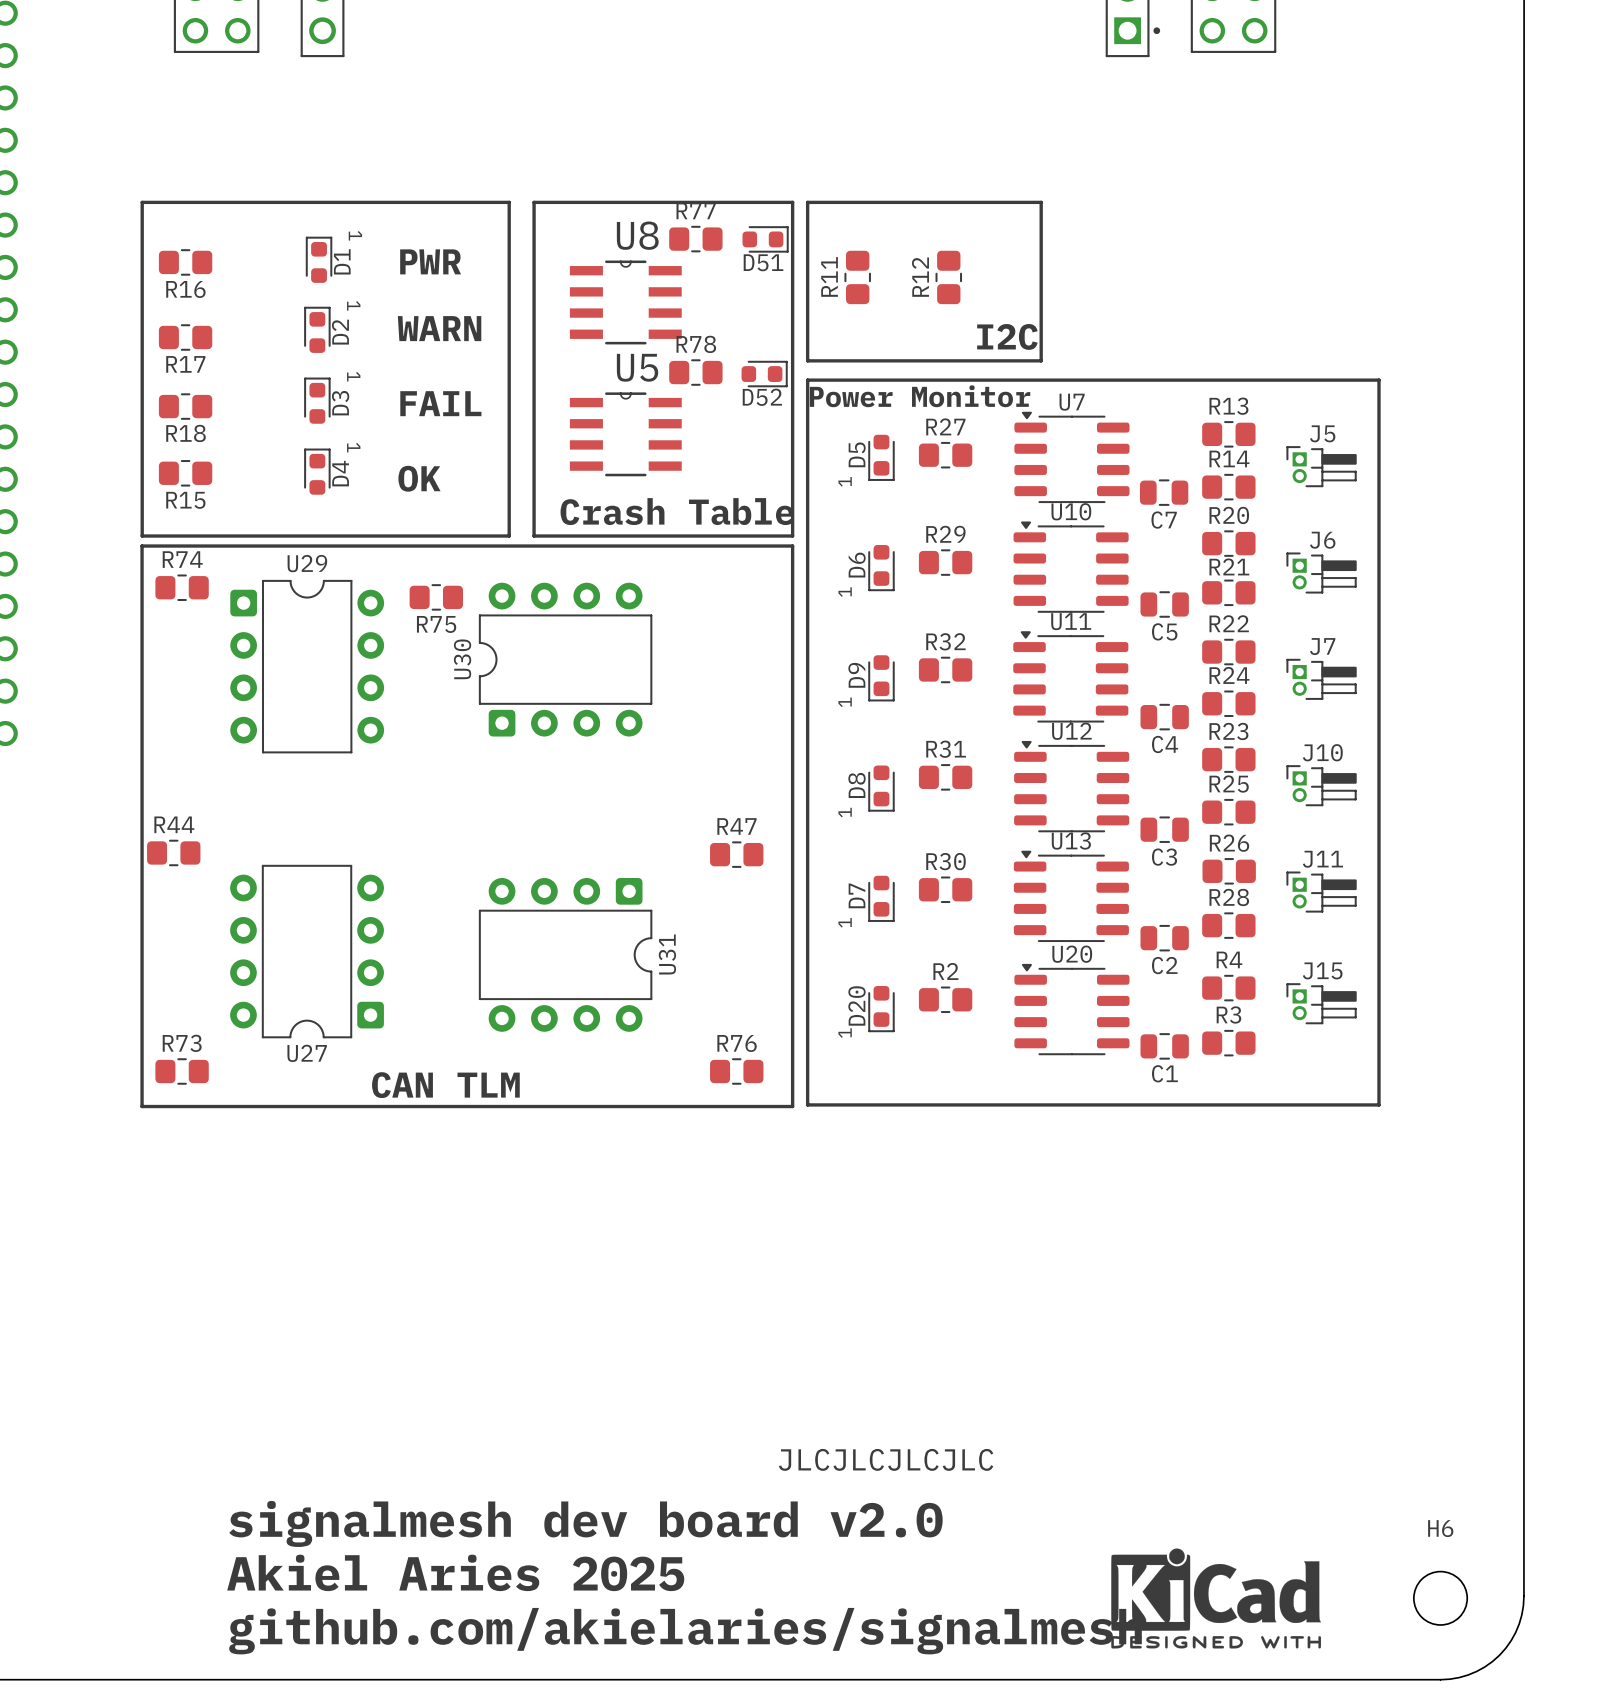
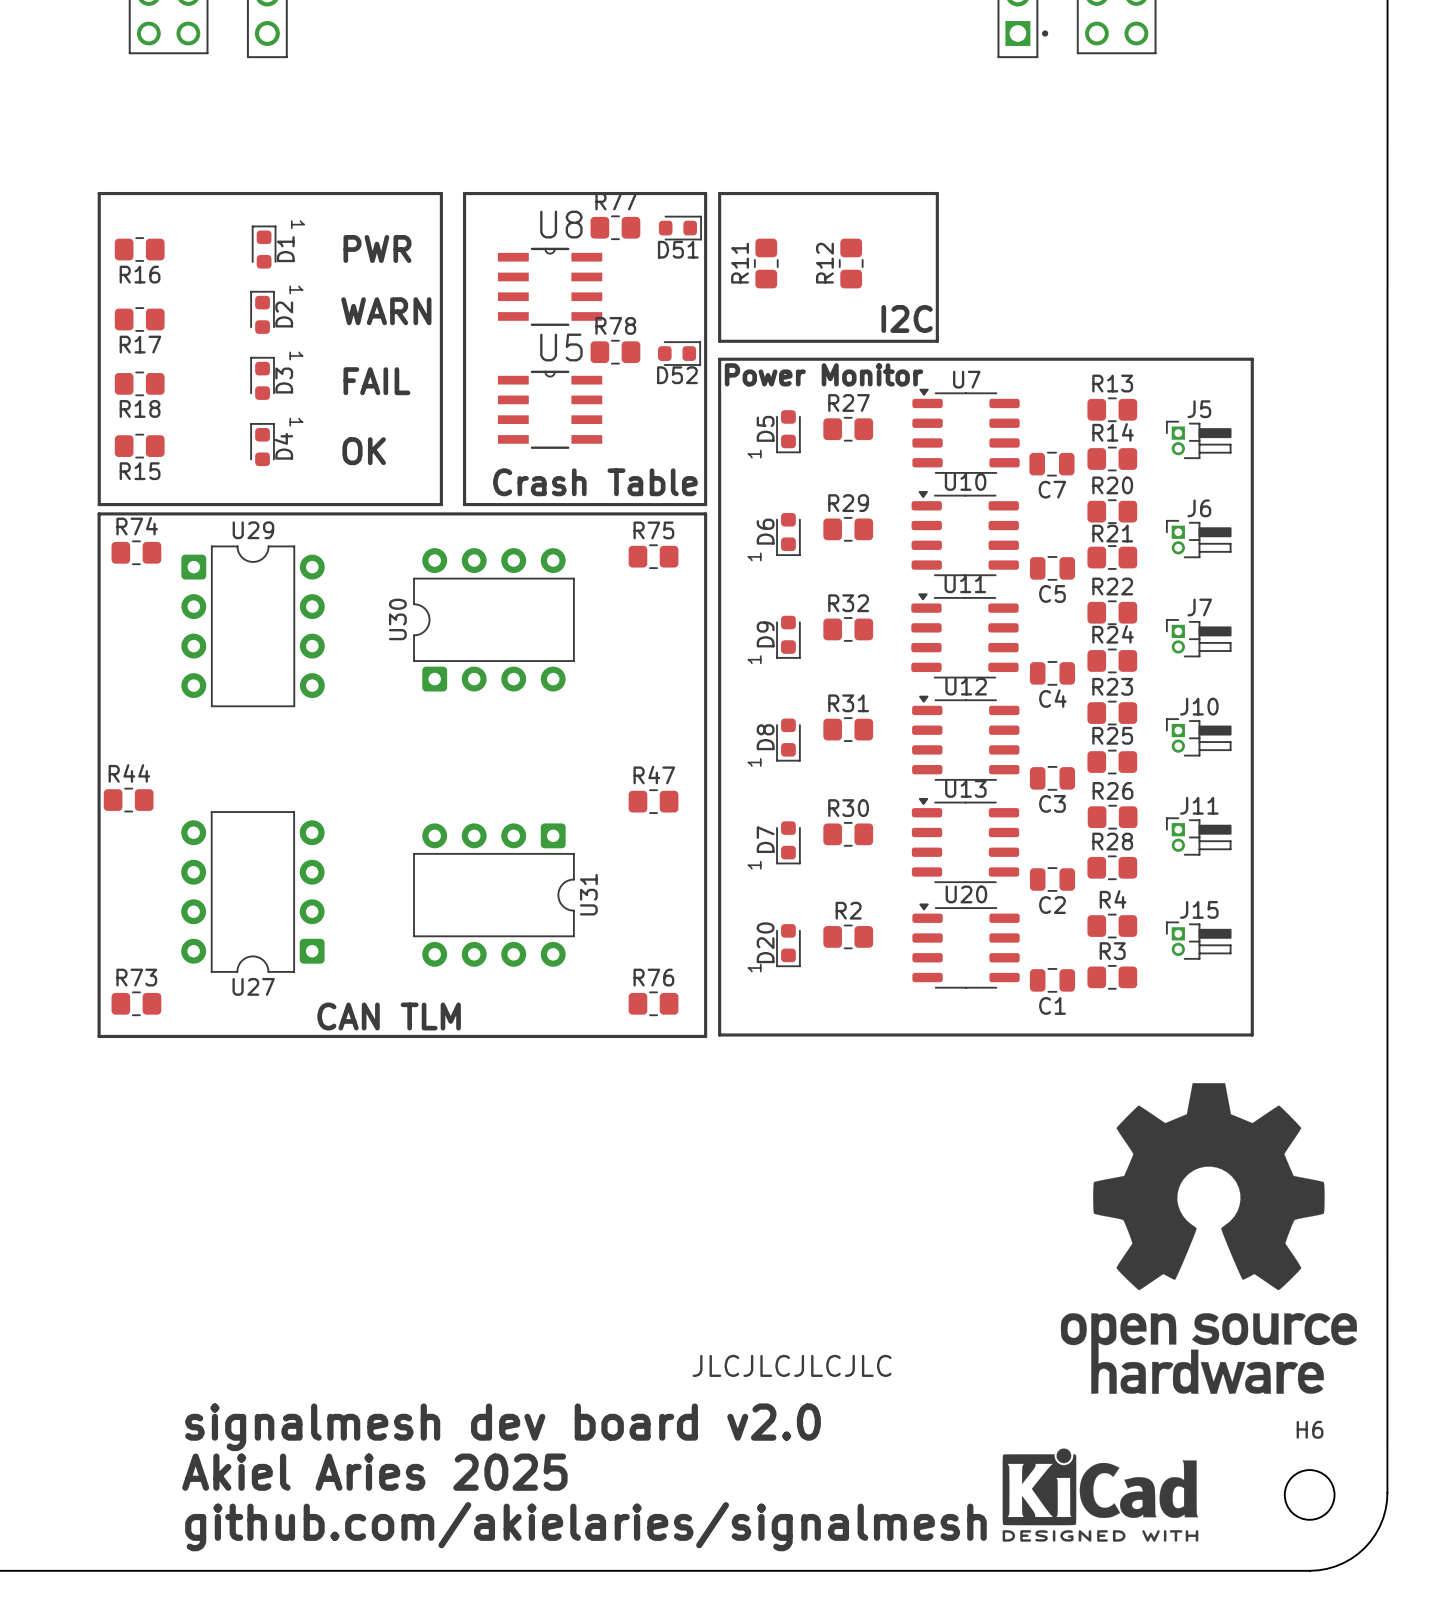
R75 position: (436, 597) -> (653, 556)
R75 name position: R75 (436, 624) -> R75 (653, 530)
drawing: none -> [1060, 1083, 1357, 1394]

